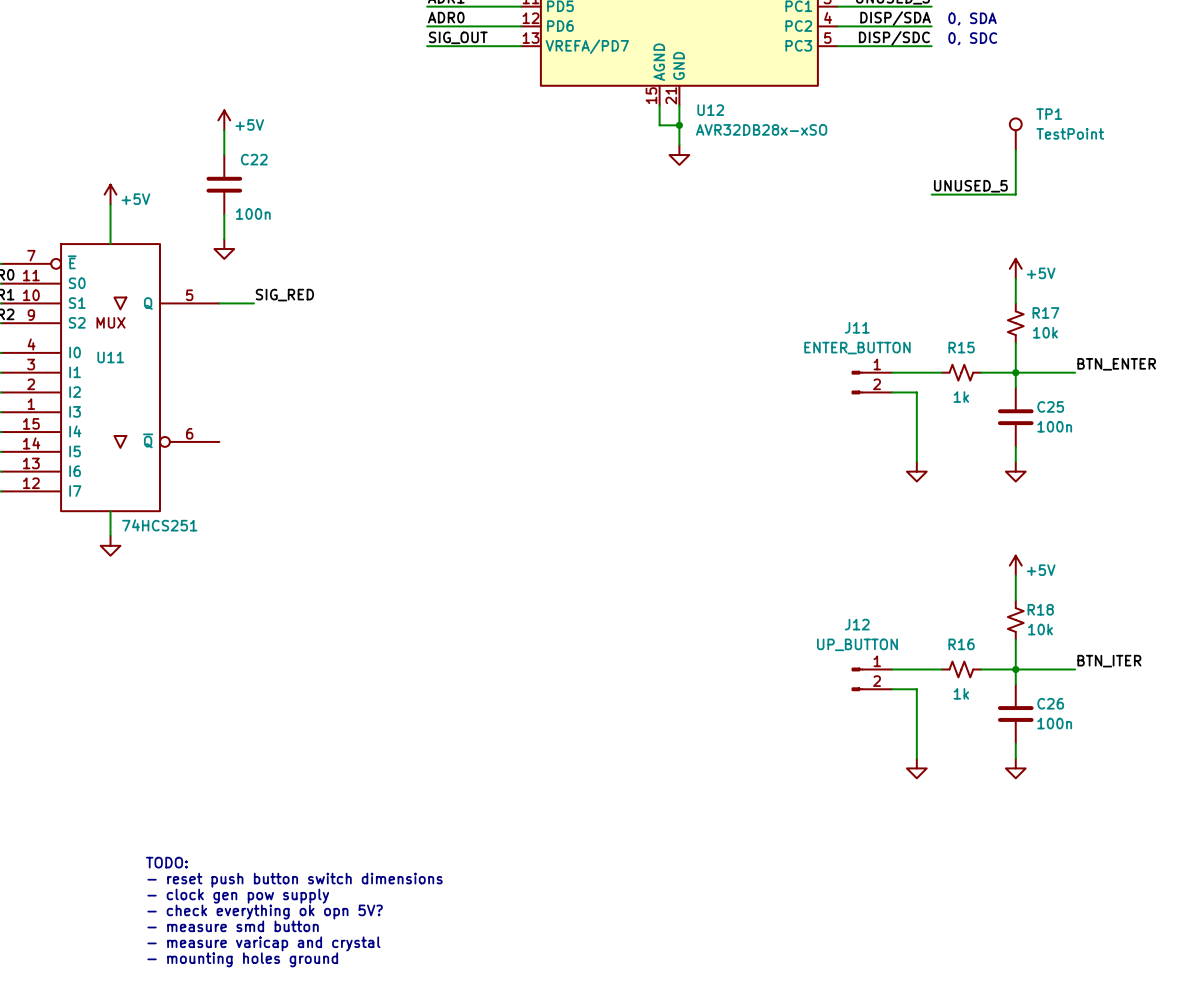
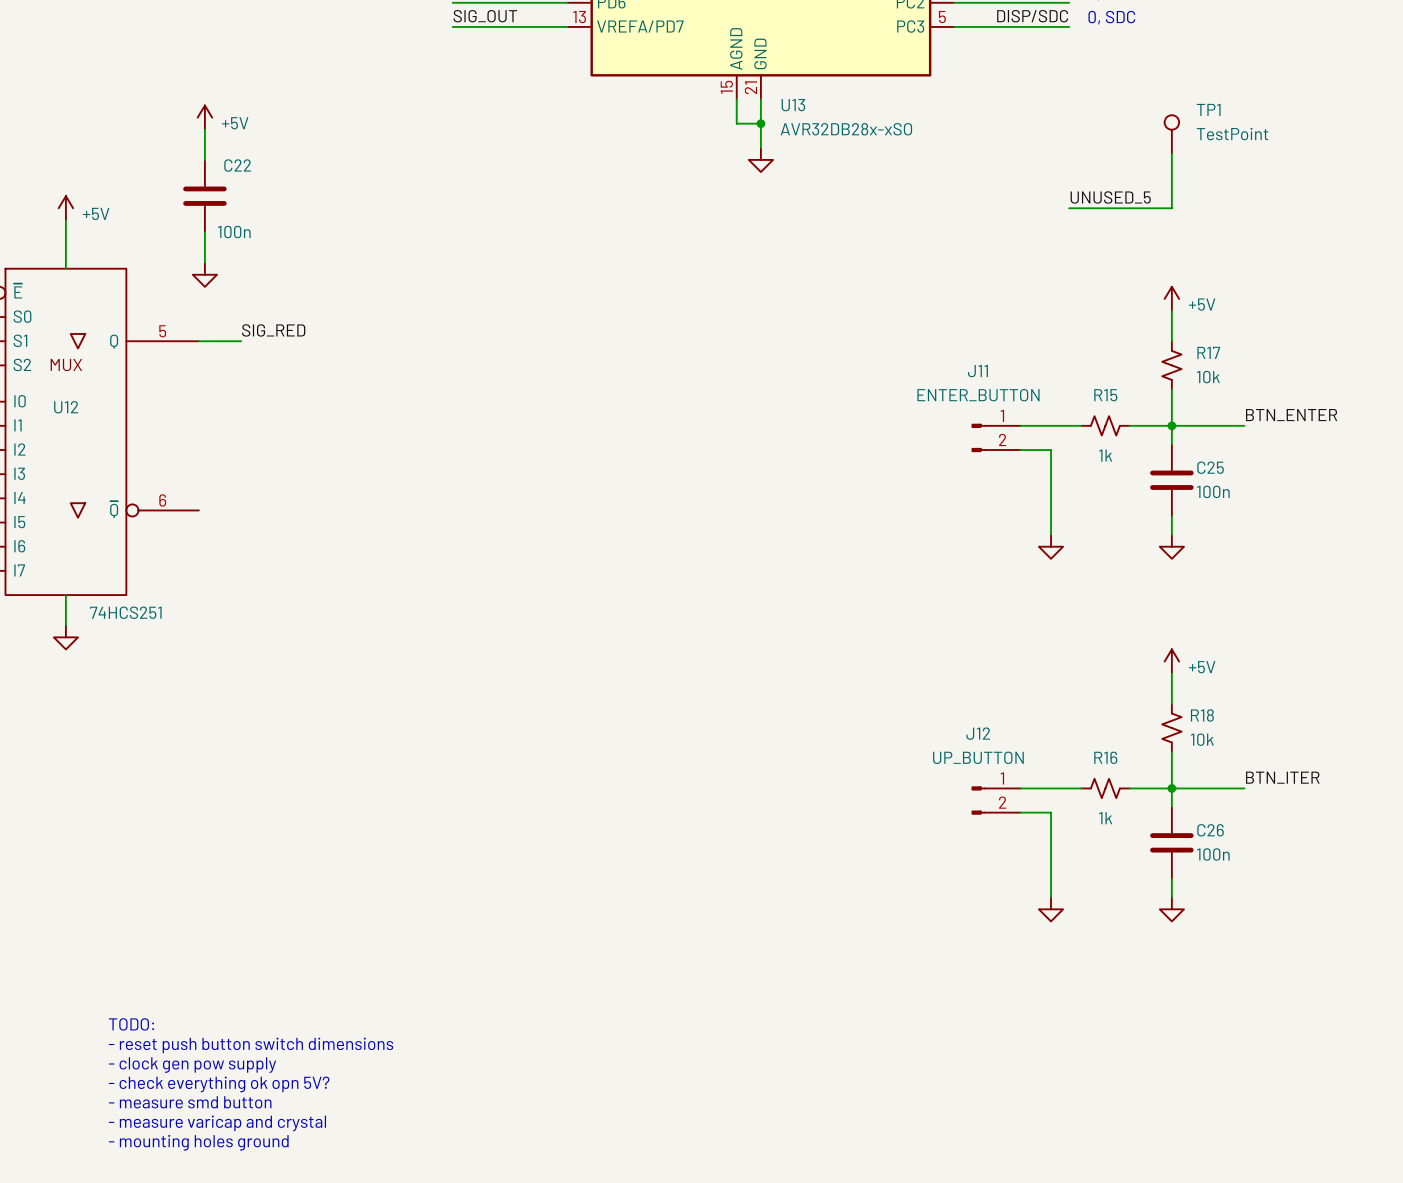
U12 name: U12 (710, 110) -> U13 (793, 105)
U11 name: U11 (110, 357) -> U12 (66, 407)

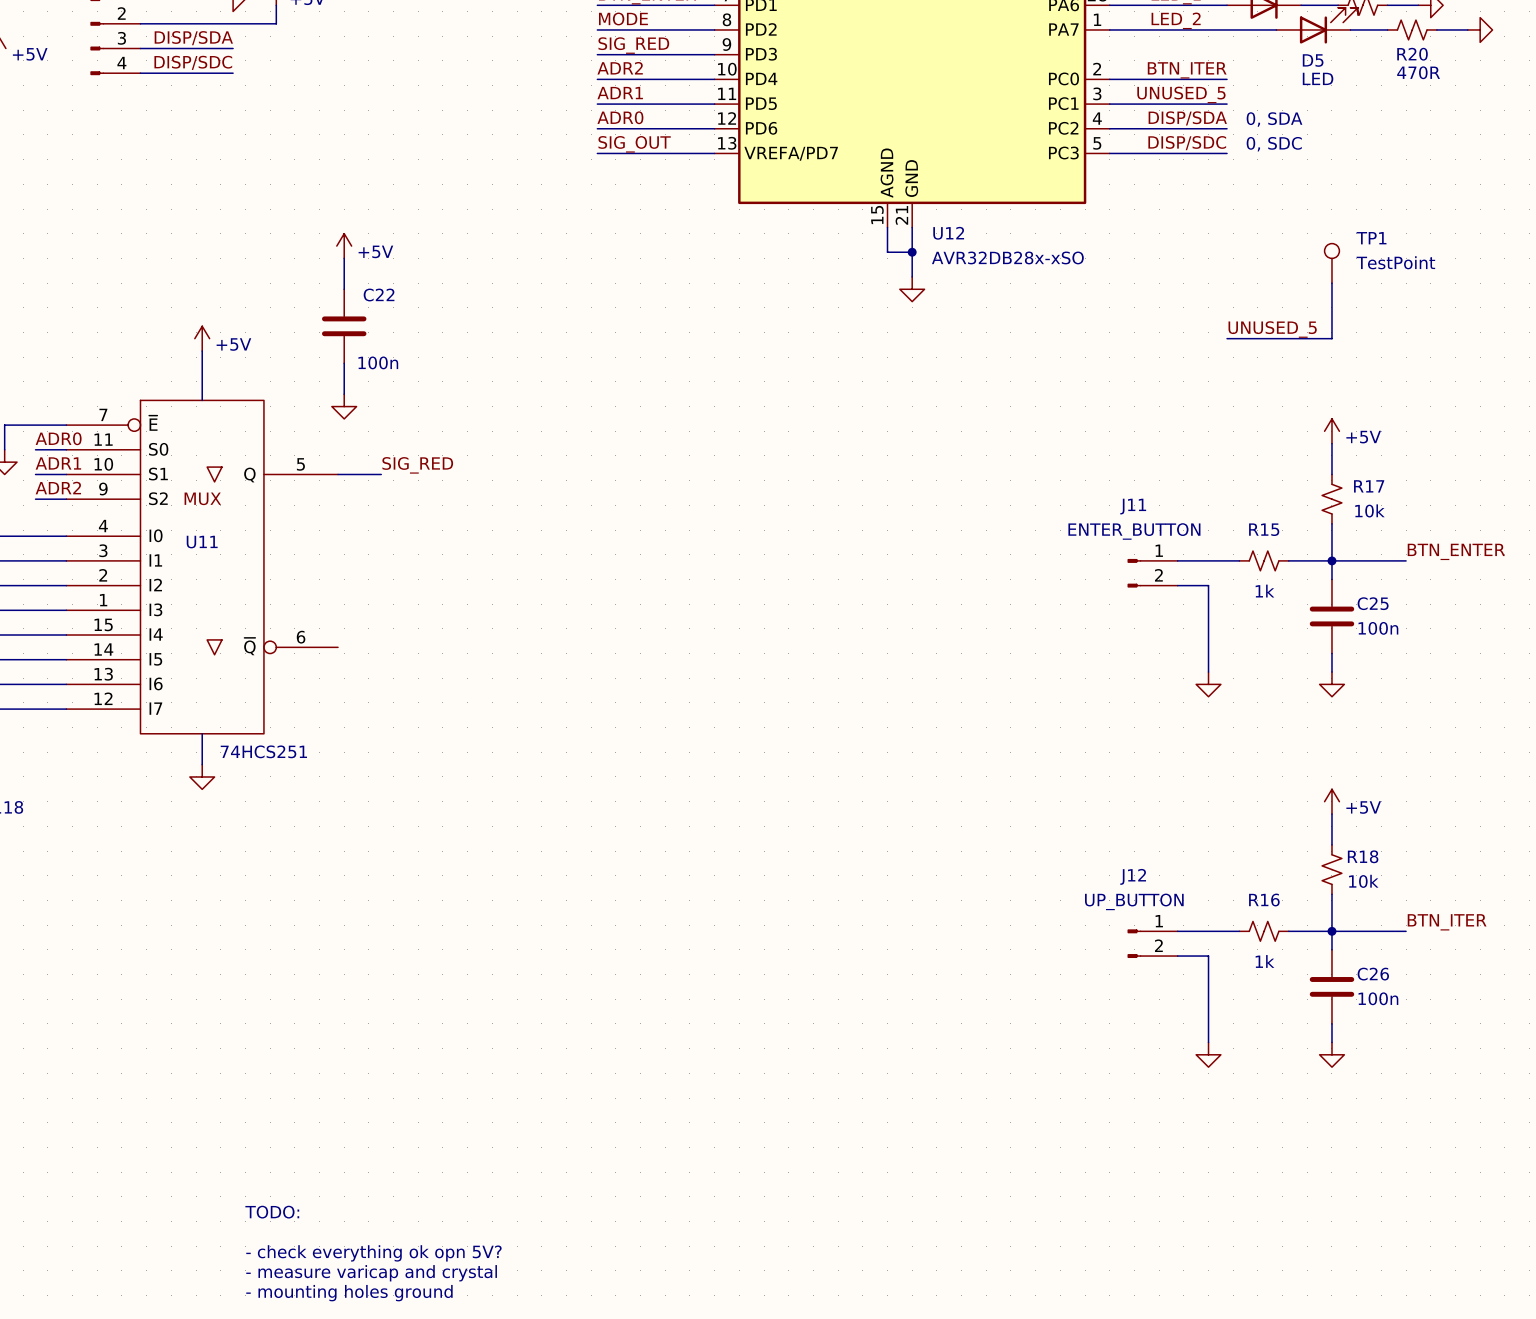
U13 name: U13 (793, 105) -> U12 (948, 233)
U12 name: U12 (66, 407) -> U11 (202, 542)
text: TODO: (131, 1024) -> none
text: - reset push button switch dimensions (251, 1045) -> none
text: - clock gen pow supply (192, 1065) -> TODO: (272, 1212)
text: - check everything ok opn 5V? (219, 1084) -> none
text: - measure smd button (190, 1102) -> - check everything ok opn 5V? (373, 1253)

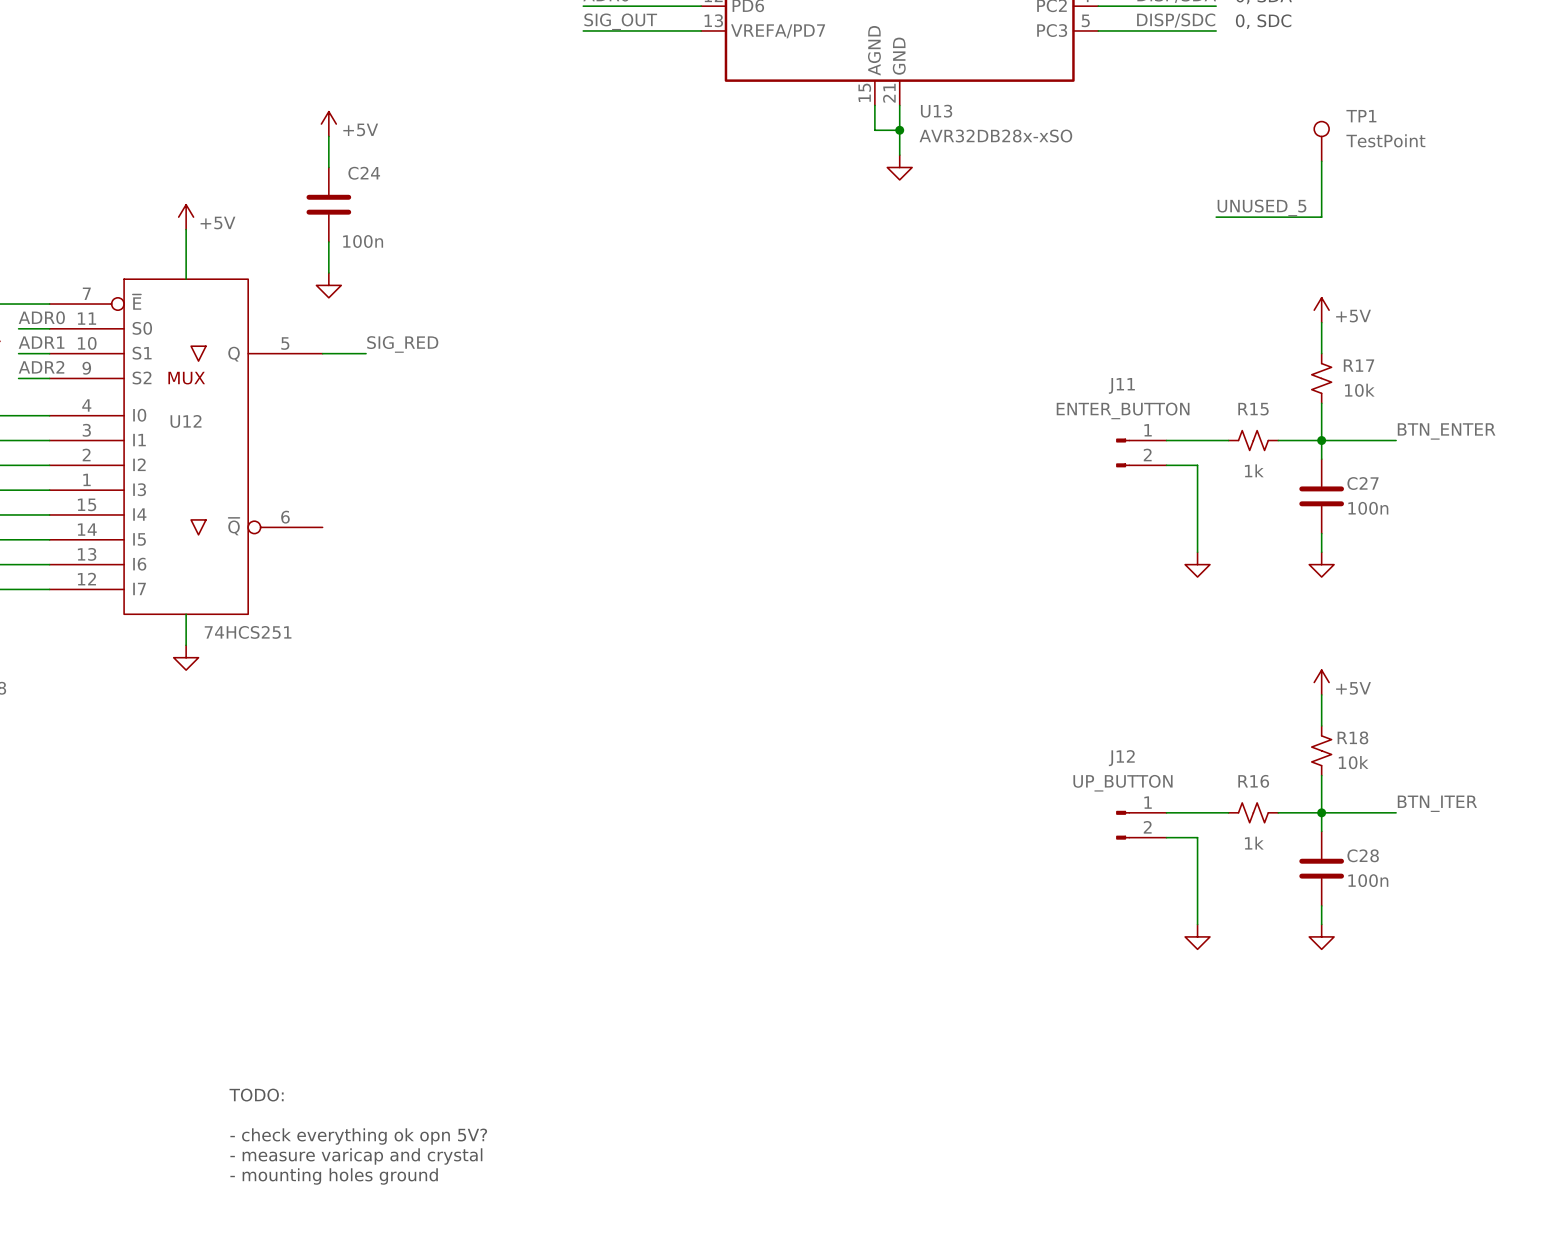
U12 name: U12 (948, 233) -> U13 (936, 111)
C22 name: C22 (379, 295) -> C24 (364, 173)
U11 name: U11 (202, 542) -> U12 (186, 421)
C25 name: C25 (1373, 603) -> C27 (1363, 483)
C26 name: C26 (1373, 974) -> C28 (1363, 855)

